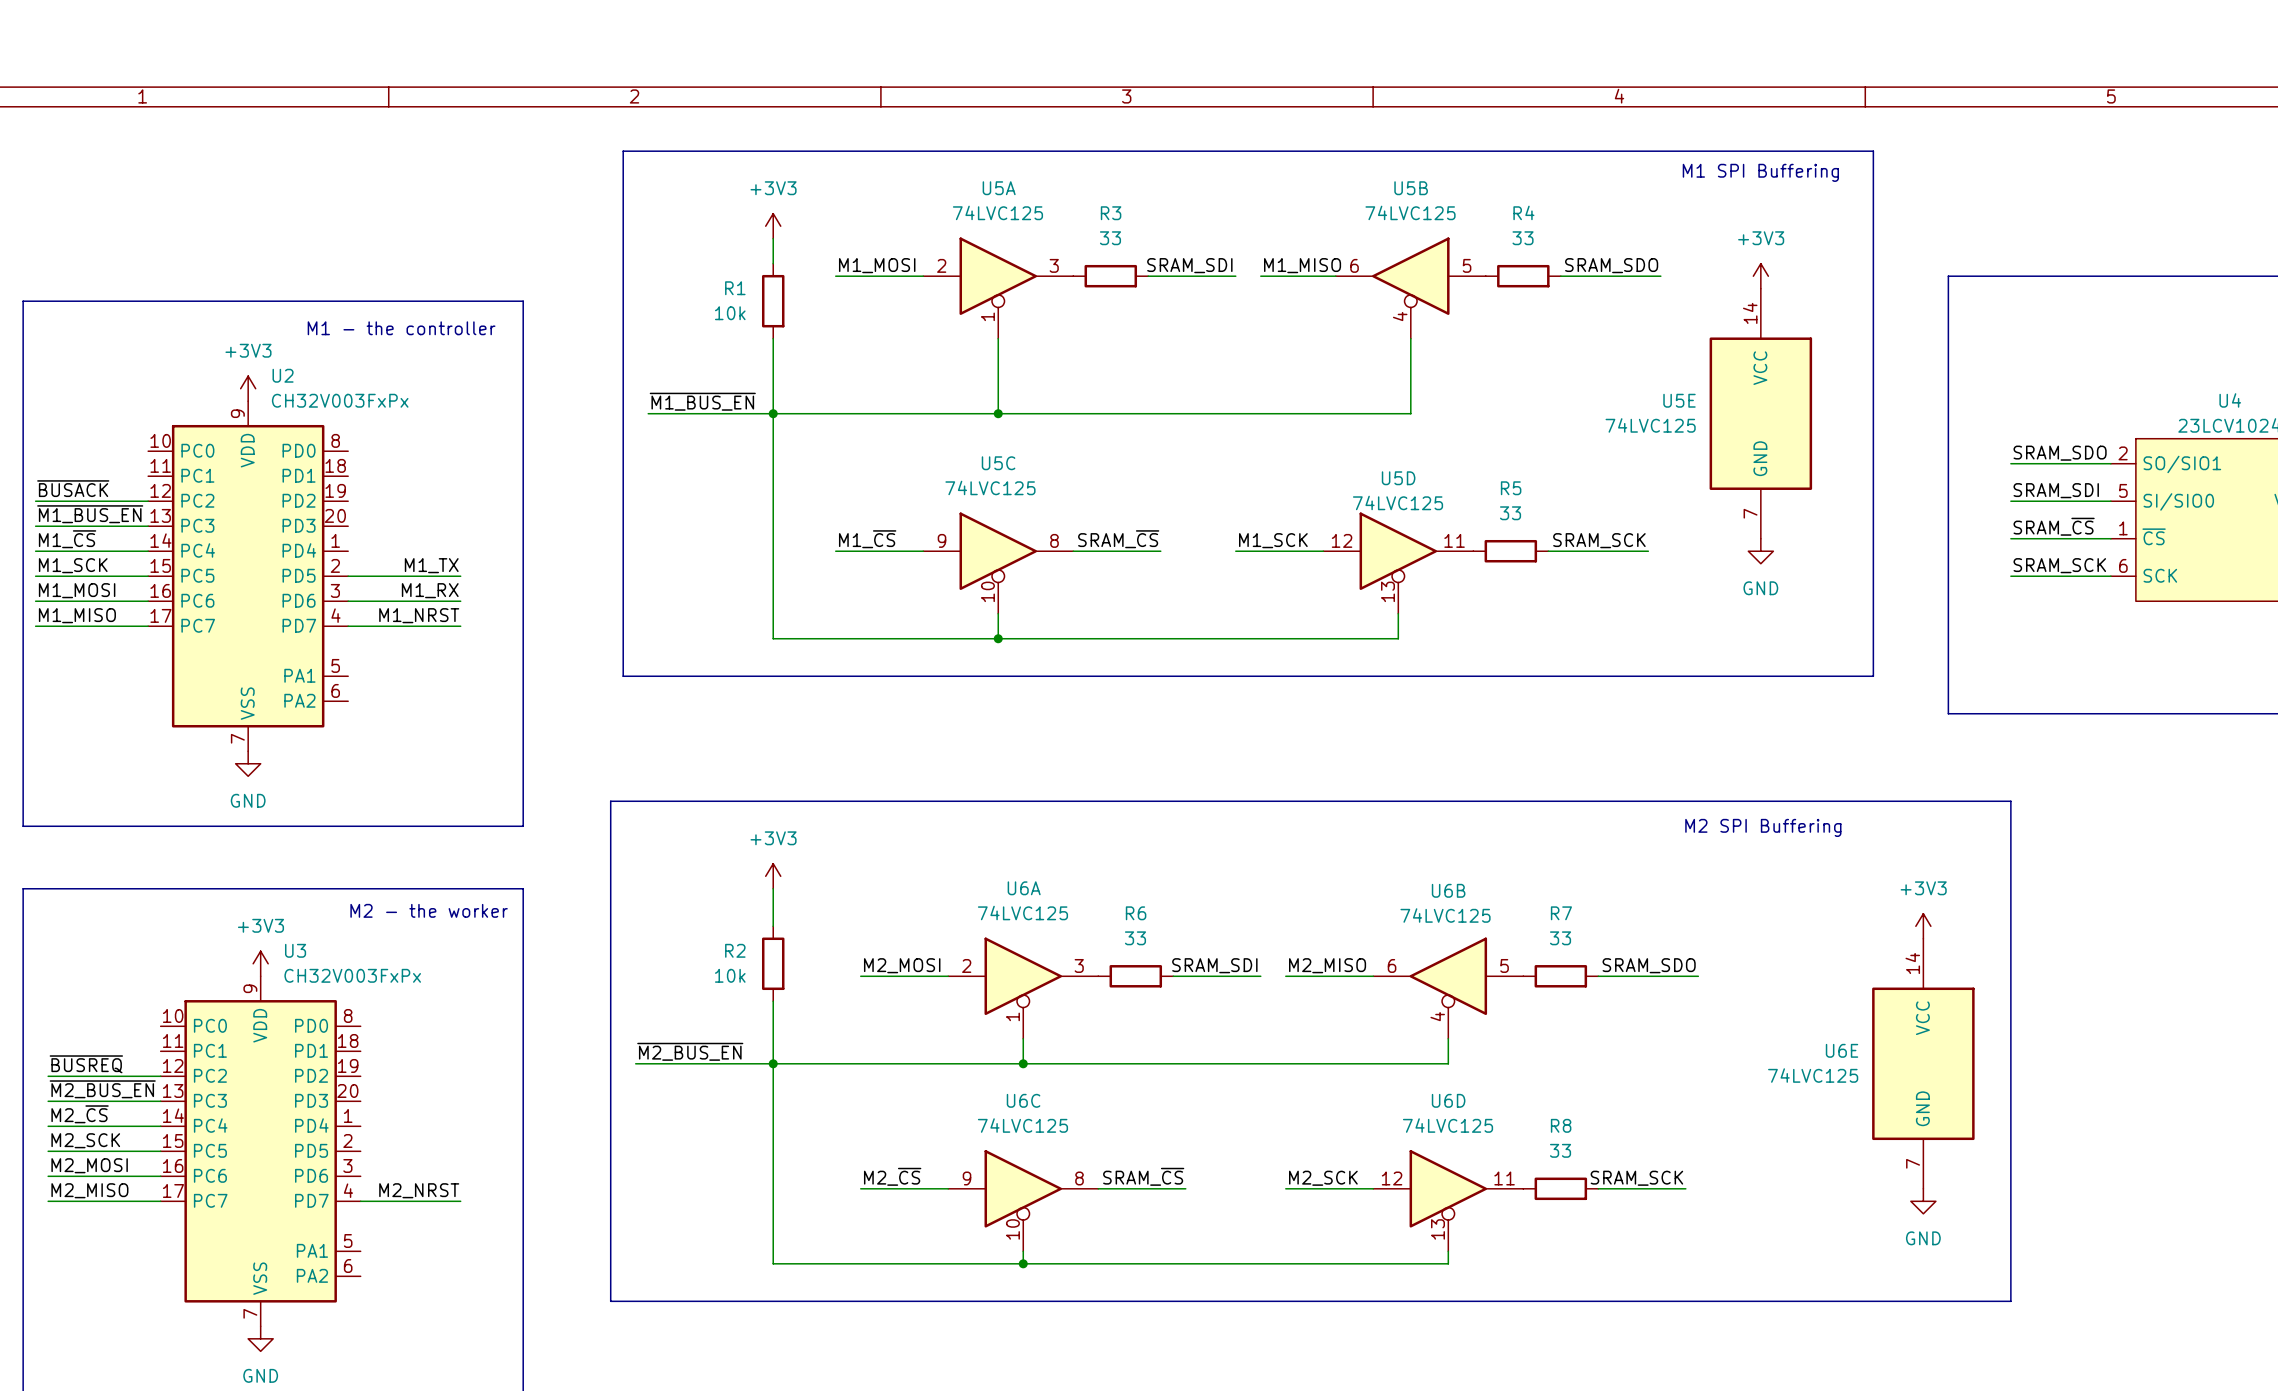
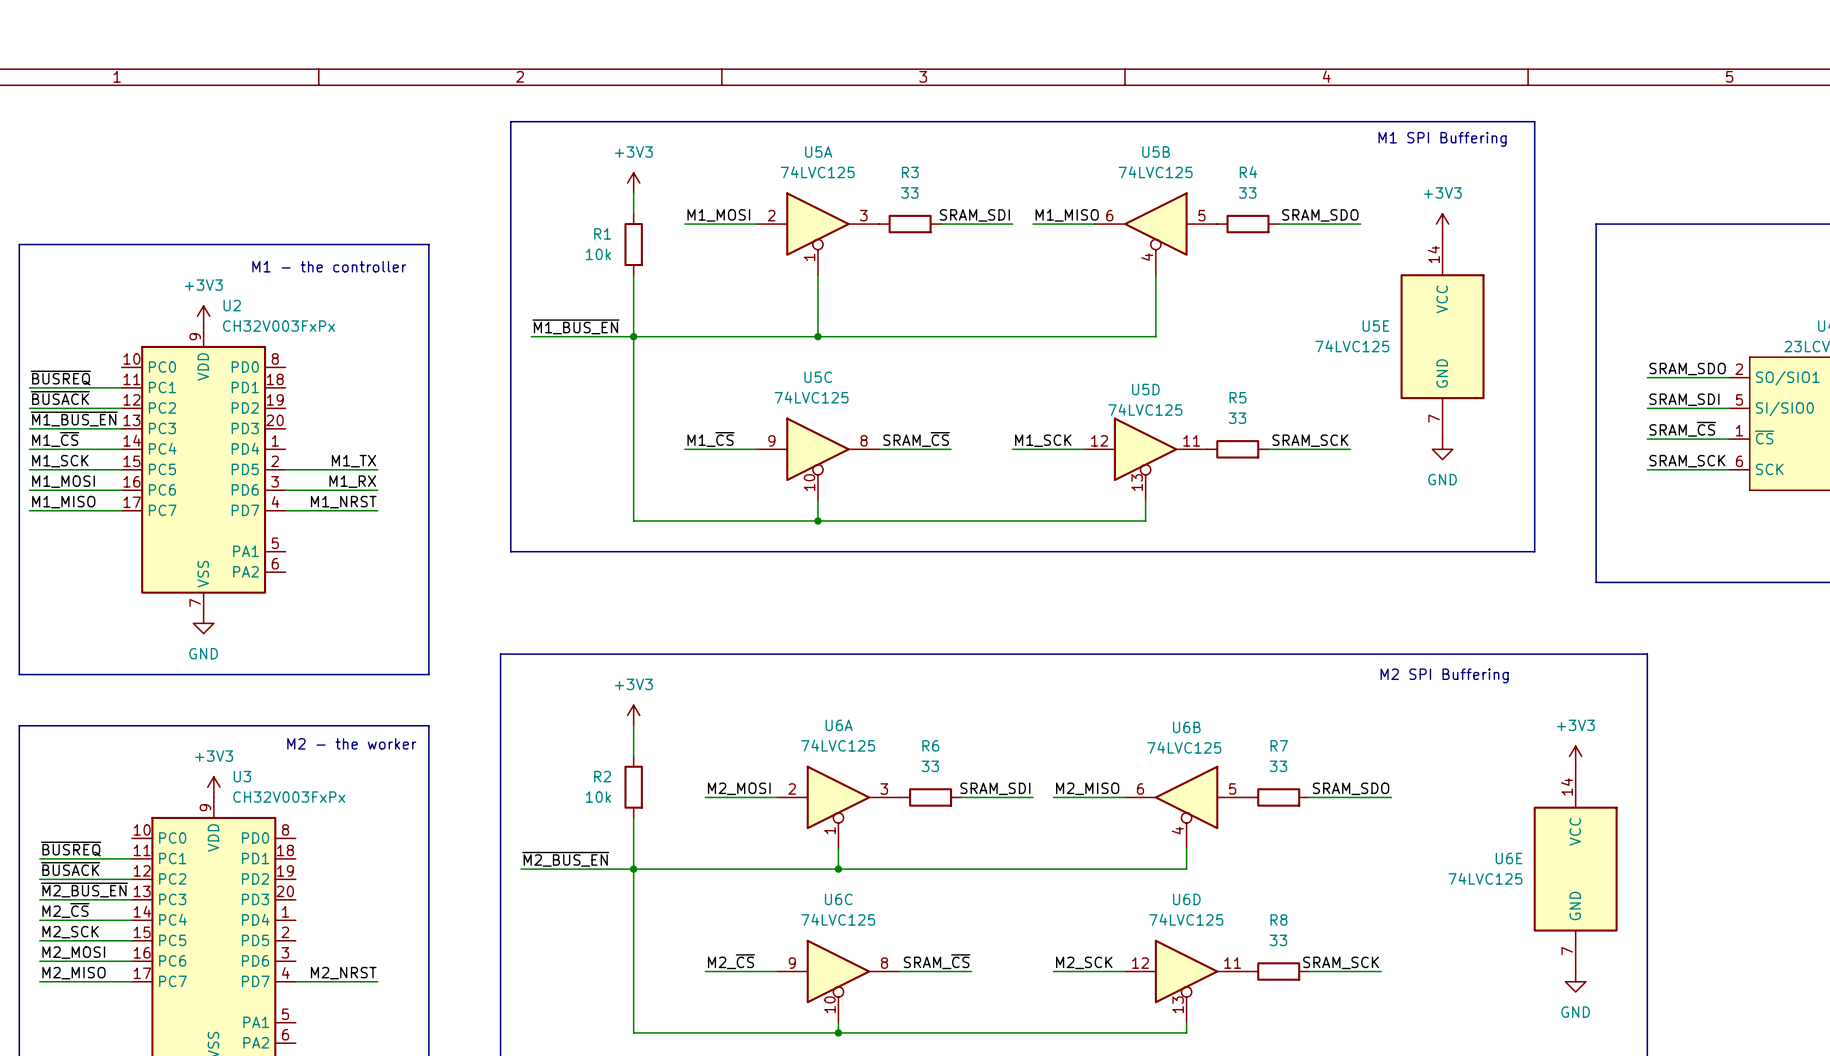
label: none -> ~{BUSREQ} (60, 378)
wire: none -> (29, 387) (121, 387)
label: none -> ~{BUSREQ} (71, 849)
wire: none -> (39, 858) (131, 858)
label: ~{BUSREQ} (86, 1064) -> ~{BUSACK} (70, 869)

